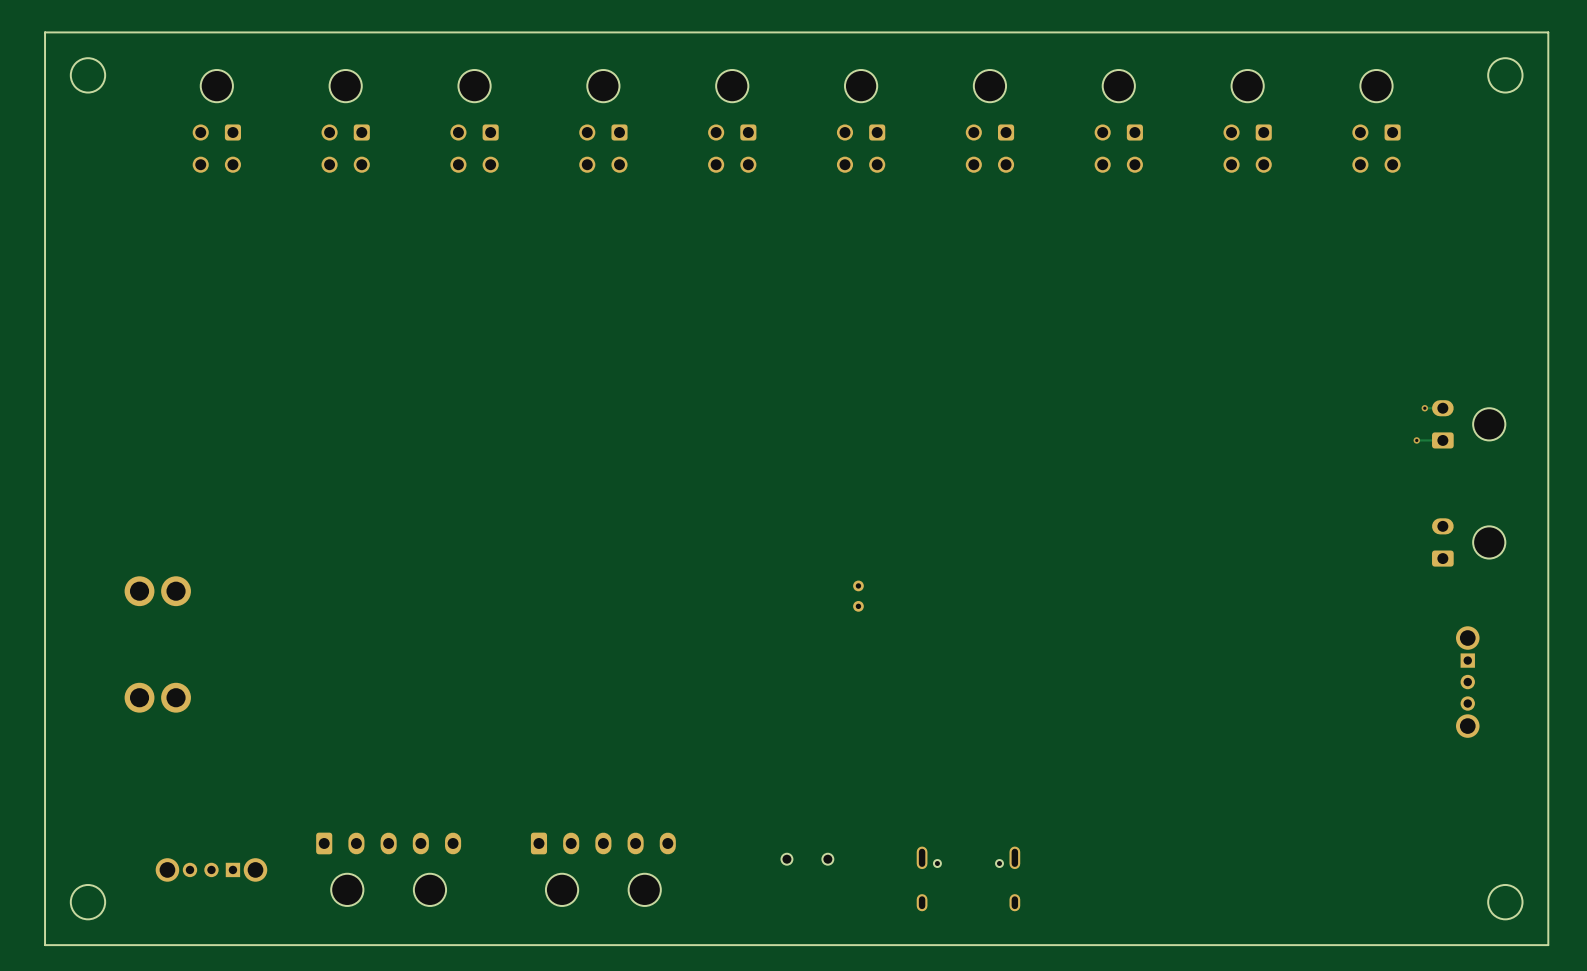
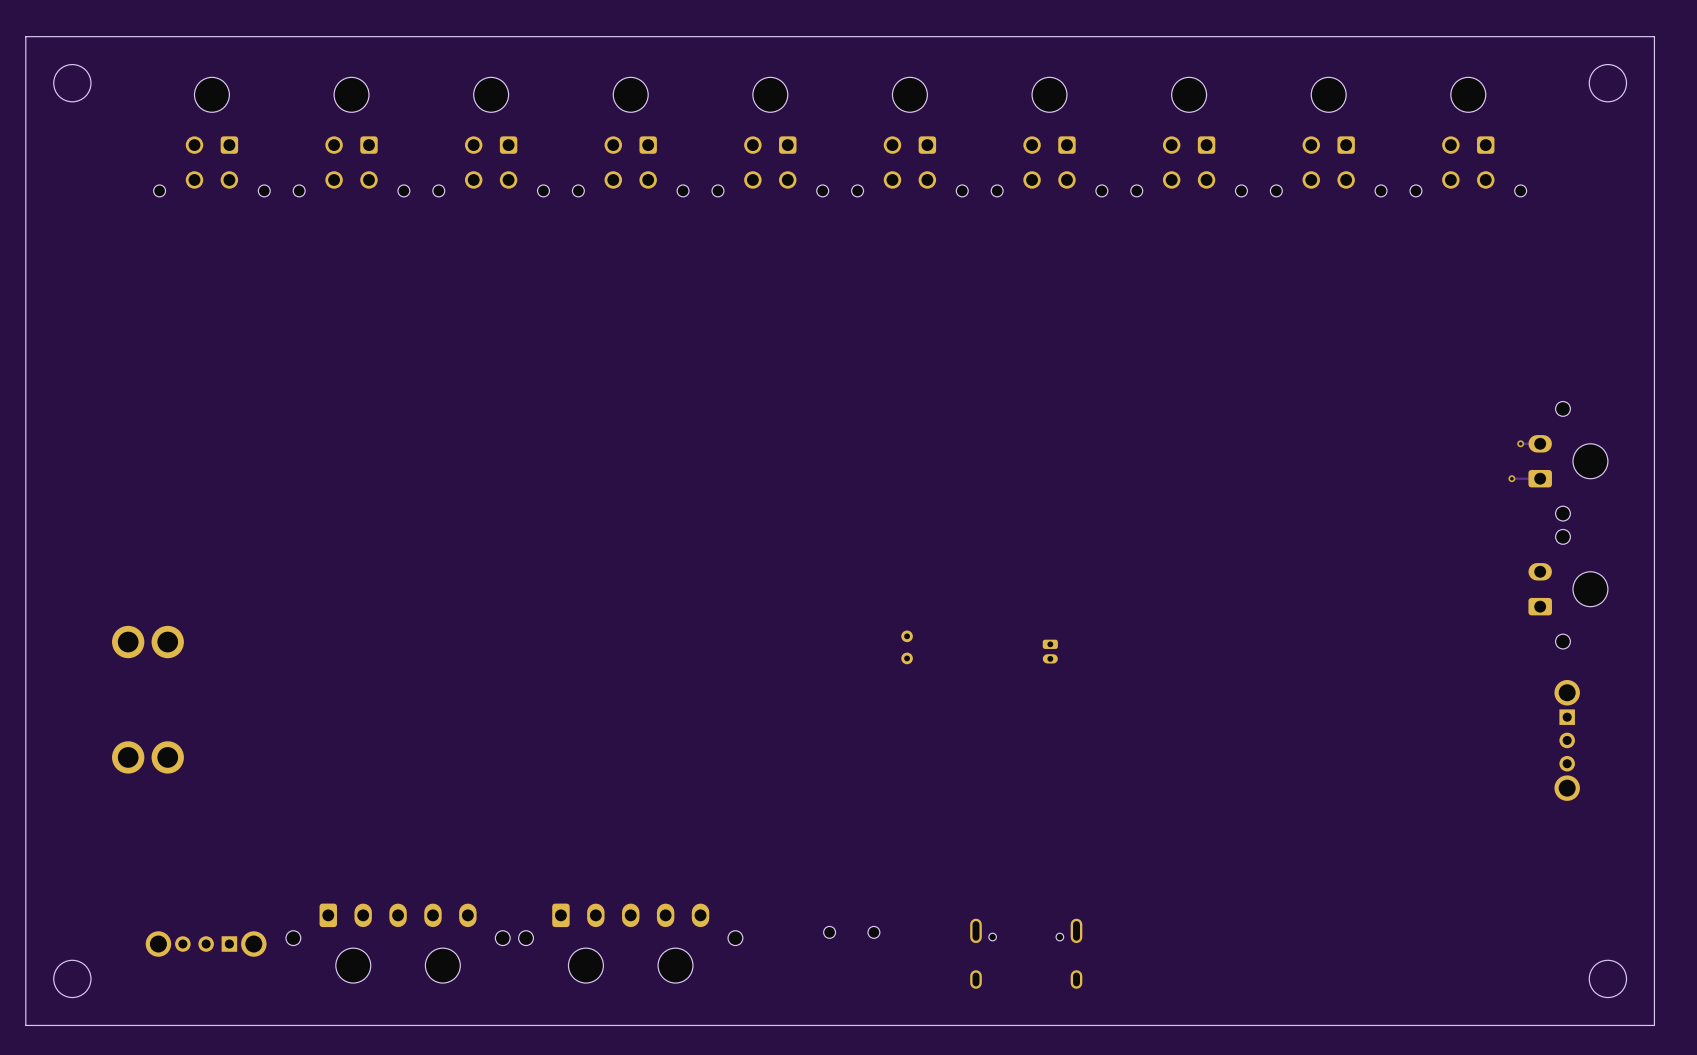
part footprint: [192, 70, 241, 173] -> [153, 77, 271, 197]
part footprint: [321, 70, 370, 173] -> [293, 77, 410, 197]
part footprint: [450, 70, 499, 173] -> [432, 77, 550, 197]
part footprint: [579, 70, 628, 173] -> [572, 77, 690, 197]
part footprint: [708, 70, 757, 173] -> [712, 77, 829, 197]
part footprint: [836, 70, 886, 173] -> [851, 77, 969, 197]
part footprint: [965, 70, 1015, 173] -> [991, 77, 1108, 197]
part footprint: [1094, 70, 1143, 173] -> [1130, 77, 1248, 197]
part footprint: [1223, 70, 1272, 173] -> [1270, 77, 1387, 197]
part footprint: [1352, 70, 1401, 173] -> [1410, 77, 1527, 197]
part footprint: [1432, 400, 1506, 449] -> [1528, 401, 1608, 521]
part footprint: [1432, 518, 1506, 567] -> [1528, 529, 1608, 649]
part: none -> (1050, 651)
part footprint: [316, 832, 462, 906] -> [285, 903, 511, 984]
part footprint: [530, 832, 676, 906] -> [518, 903, 743, 984]

